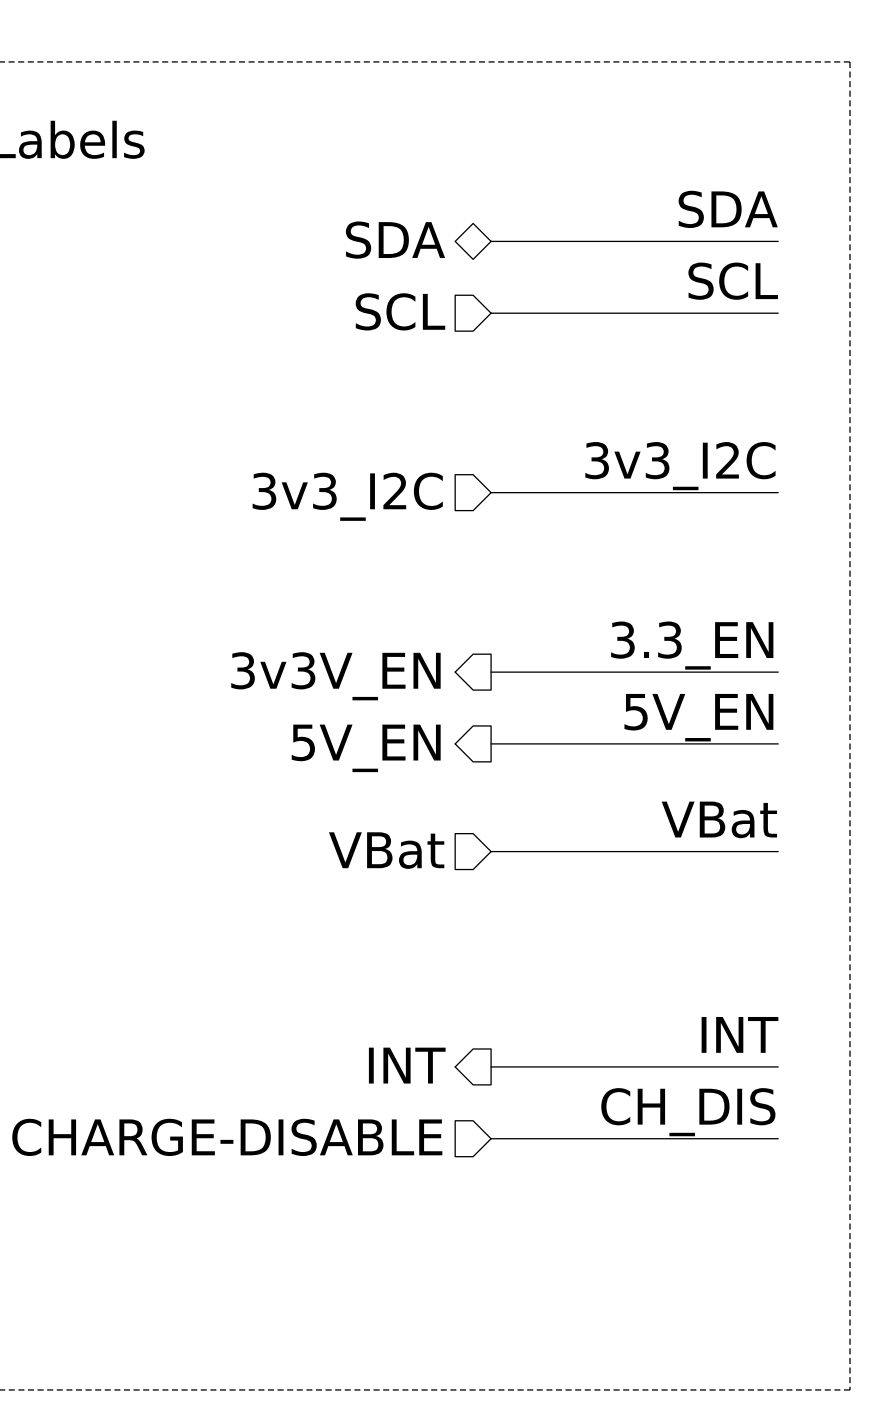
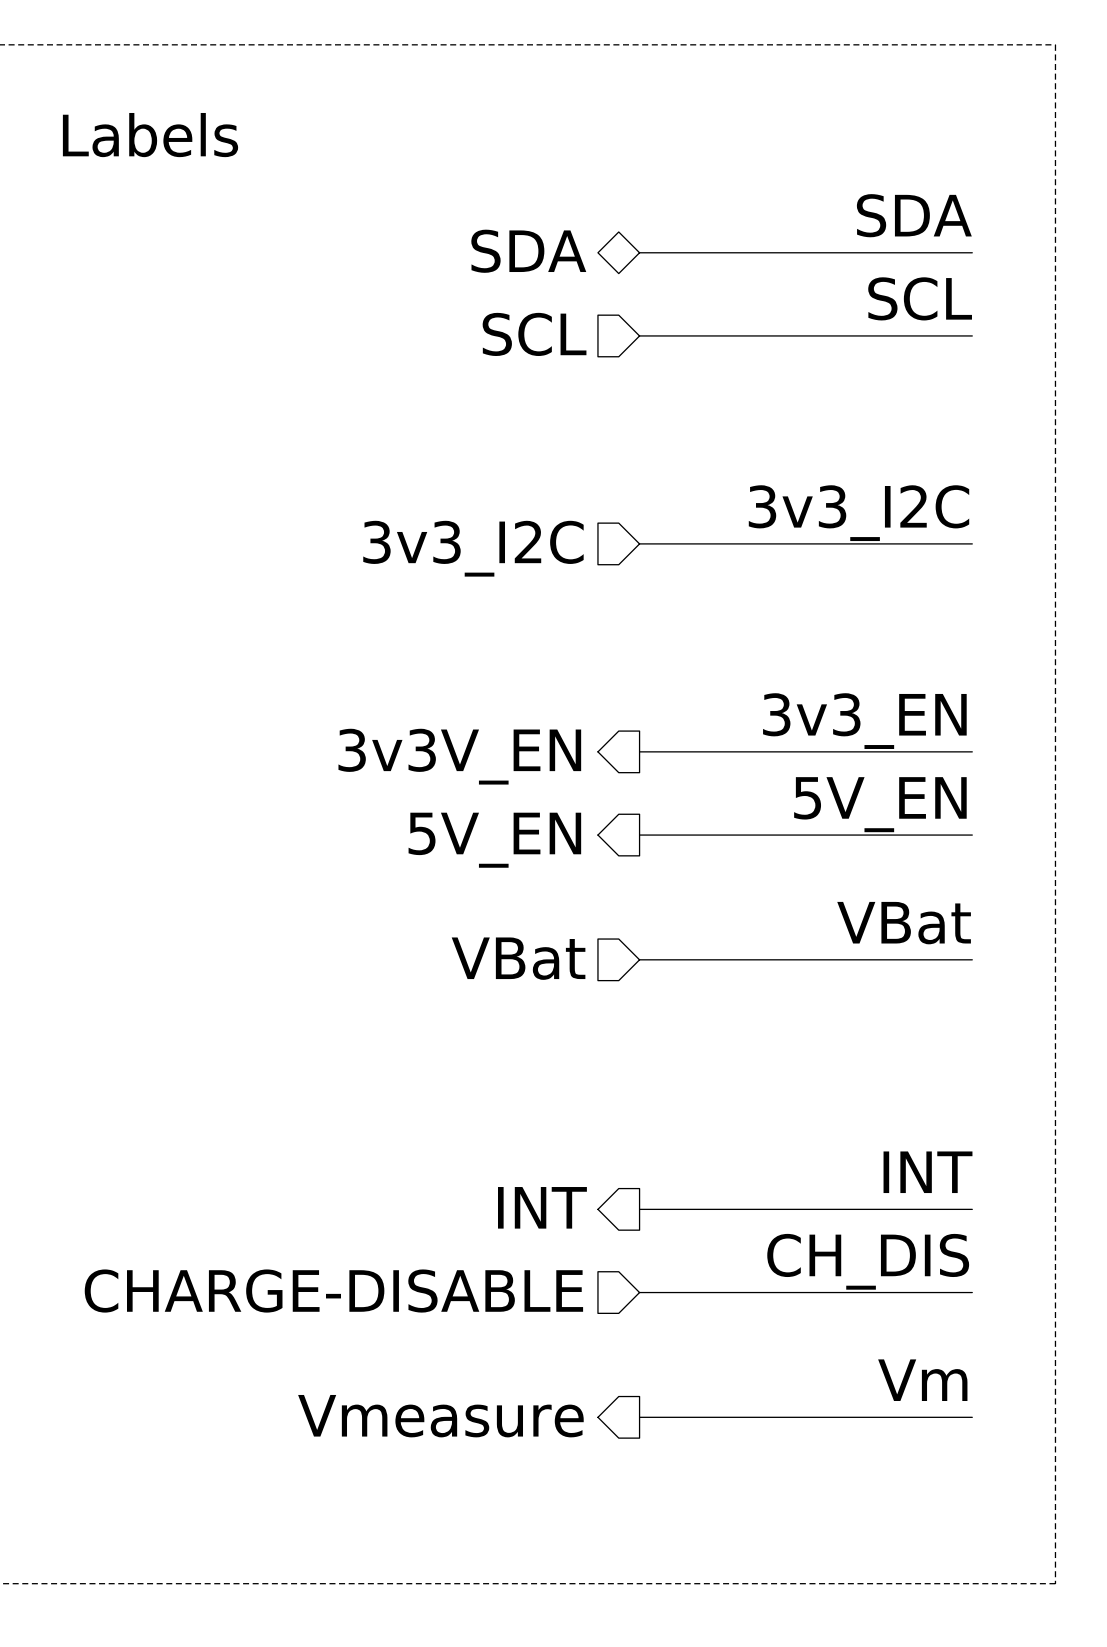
label: 3.3_EN (692, 645) -> 3v3_EN (864, 721)
label: none -> Vm (922, 1380)
hierarchical label: none -> Vmeasure (440, 1416)
wire: none -> (639, 1417) (972, 1417)

